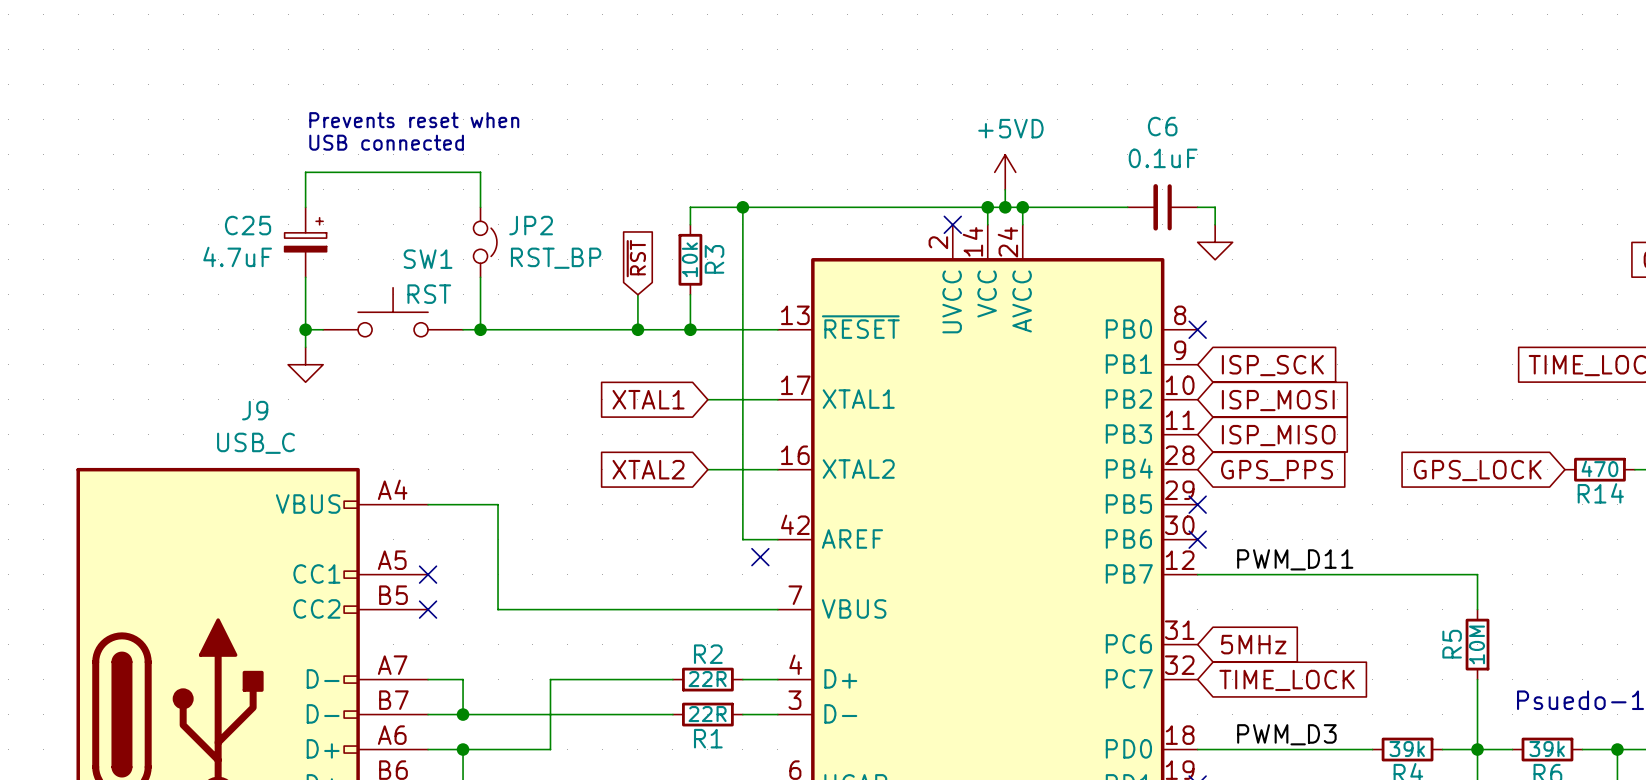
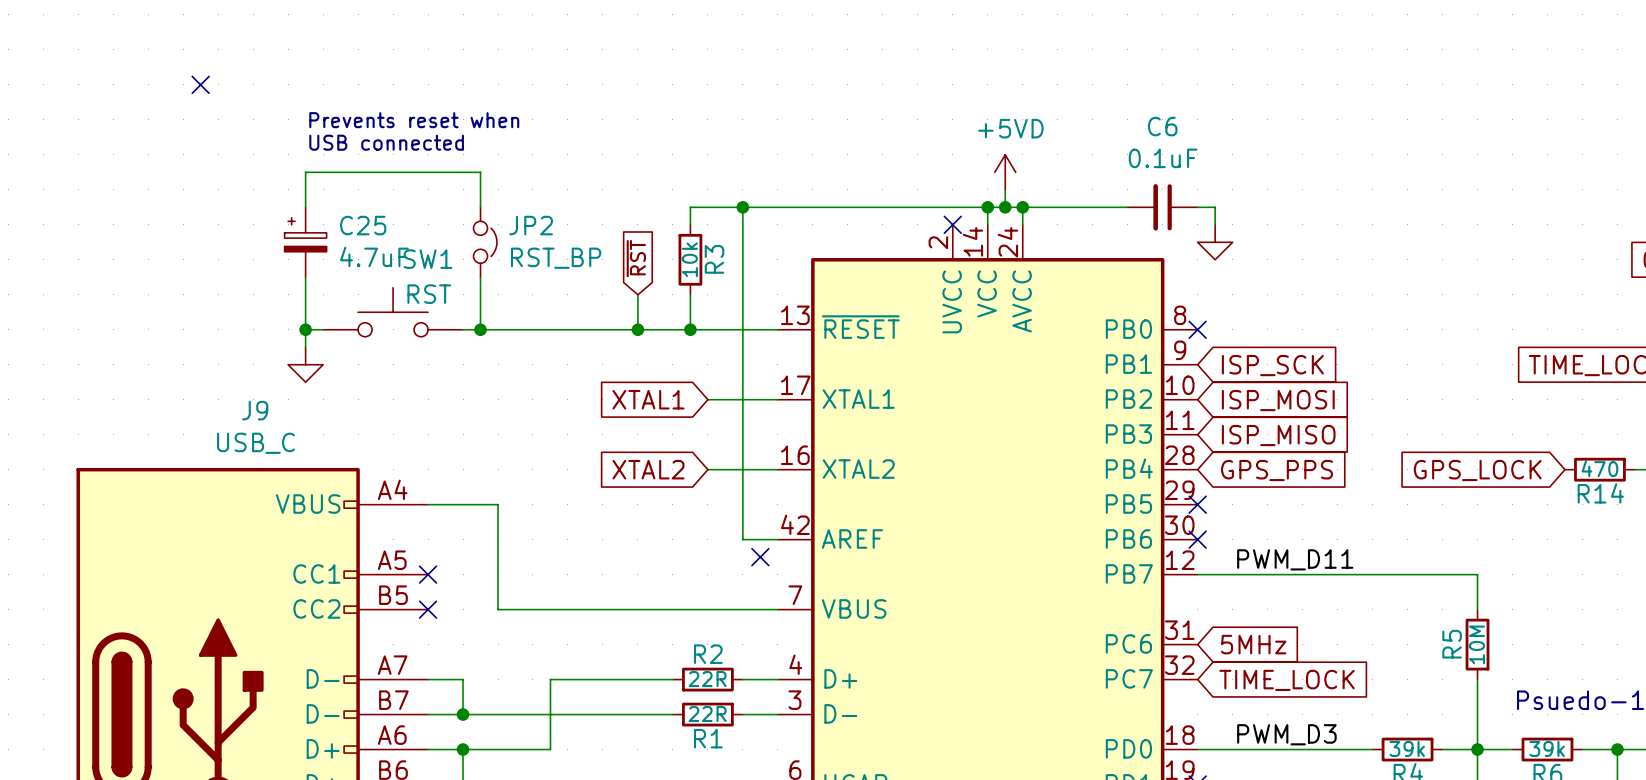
no-connect mark: none -> (200, 84)
C25 flip: as is (305, 234) -> left-right (305, 234)

